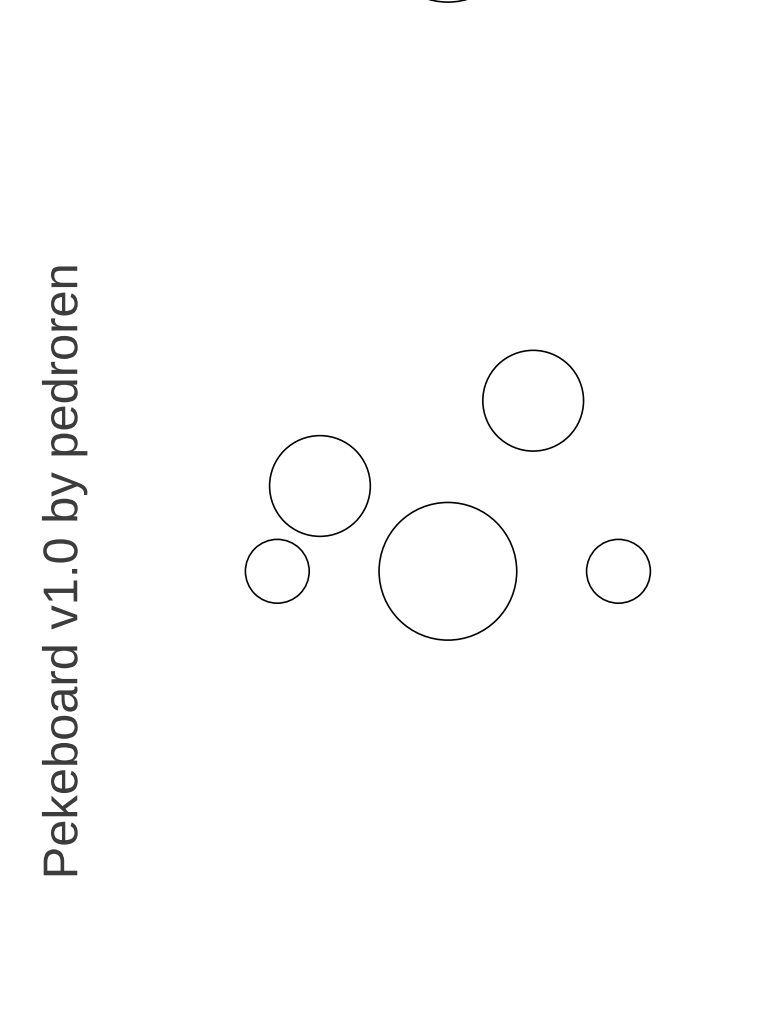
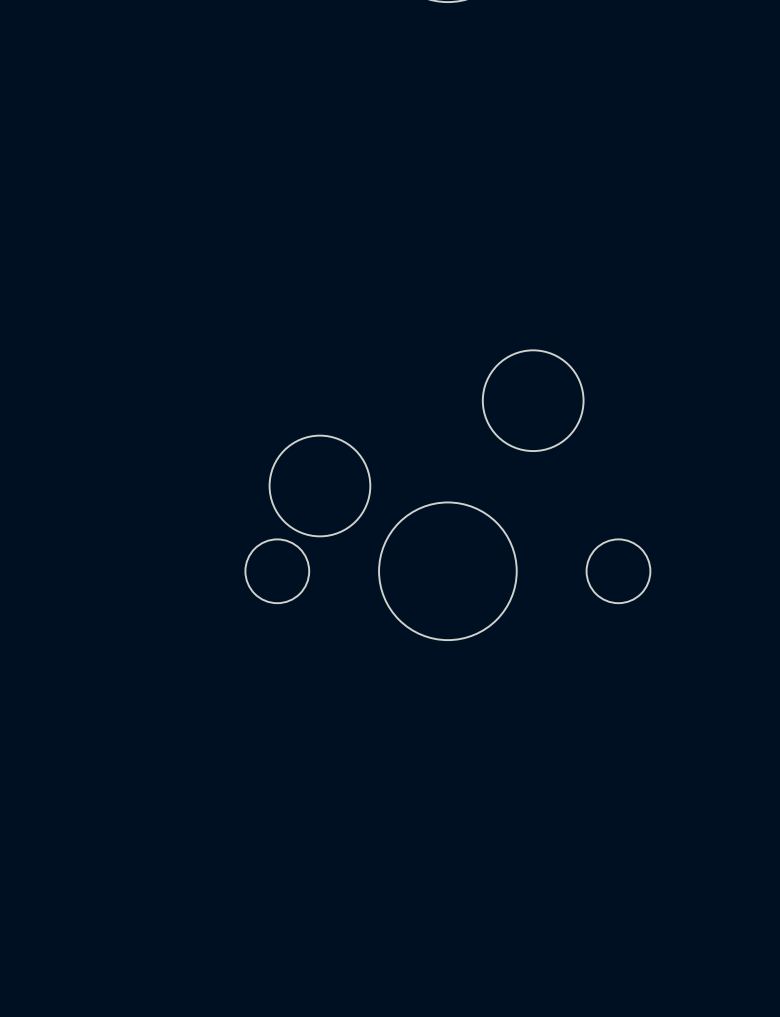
text: Pekeboard v1.0 by pedroren (64, 570) -> none

